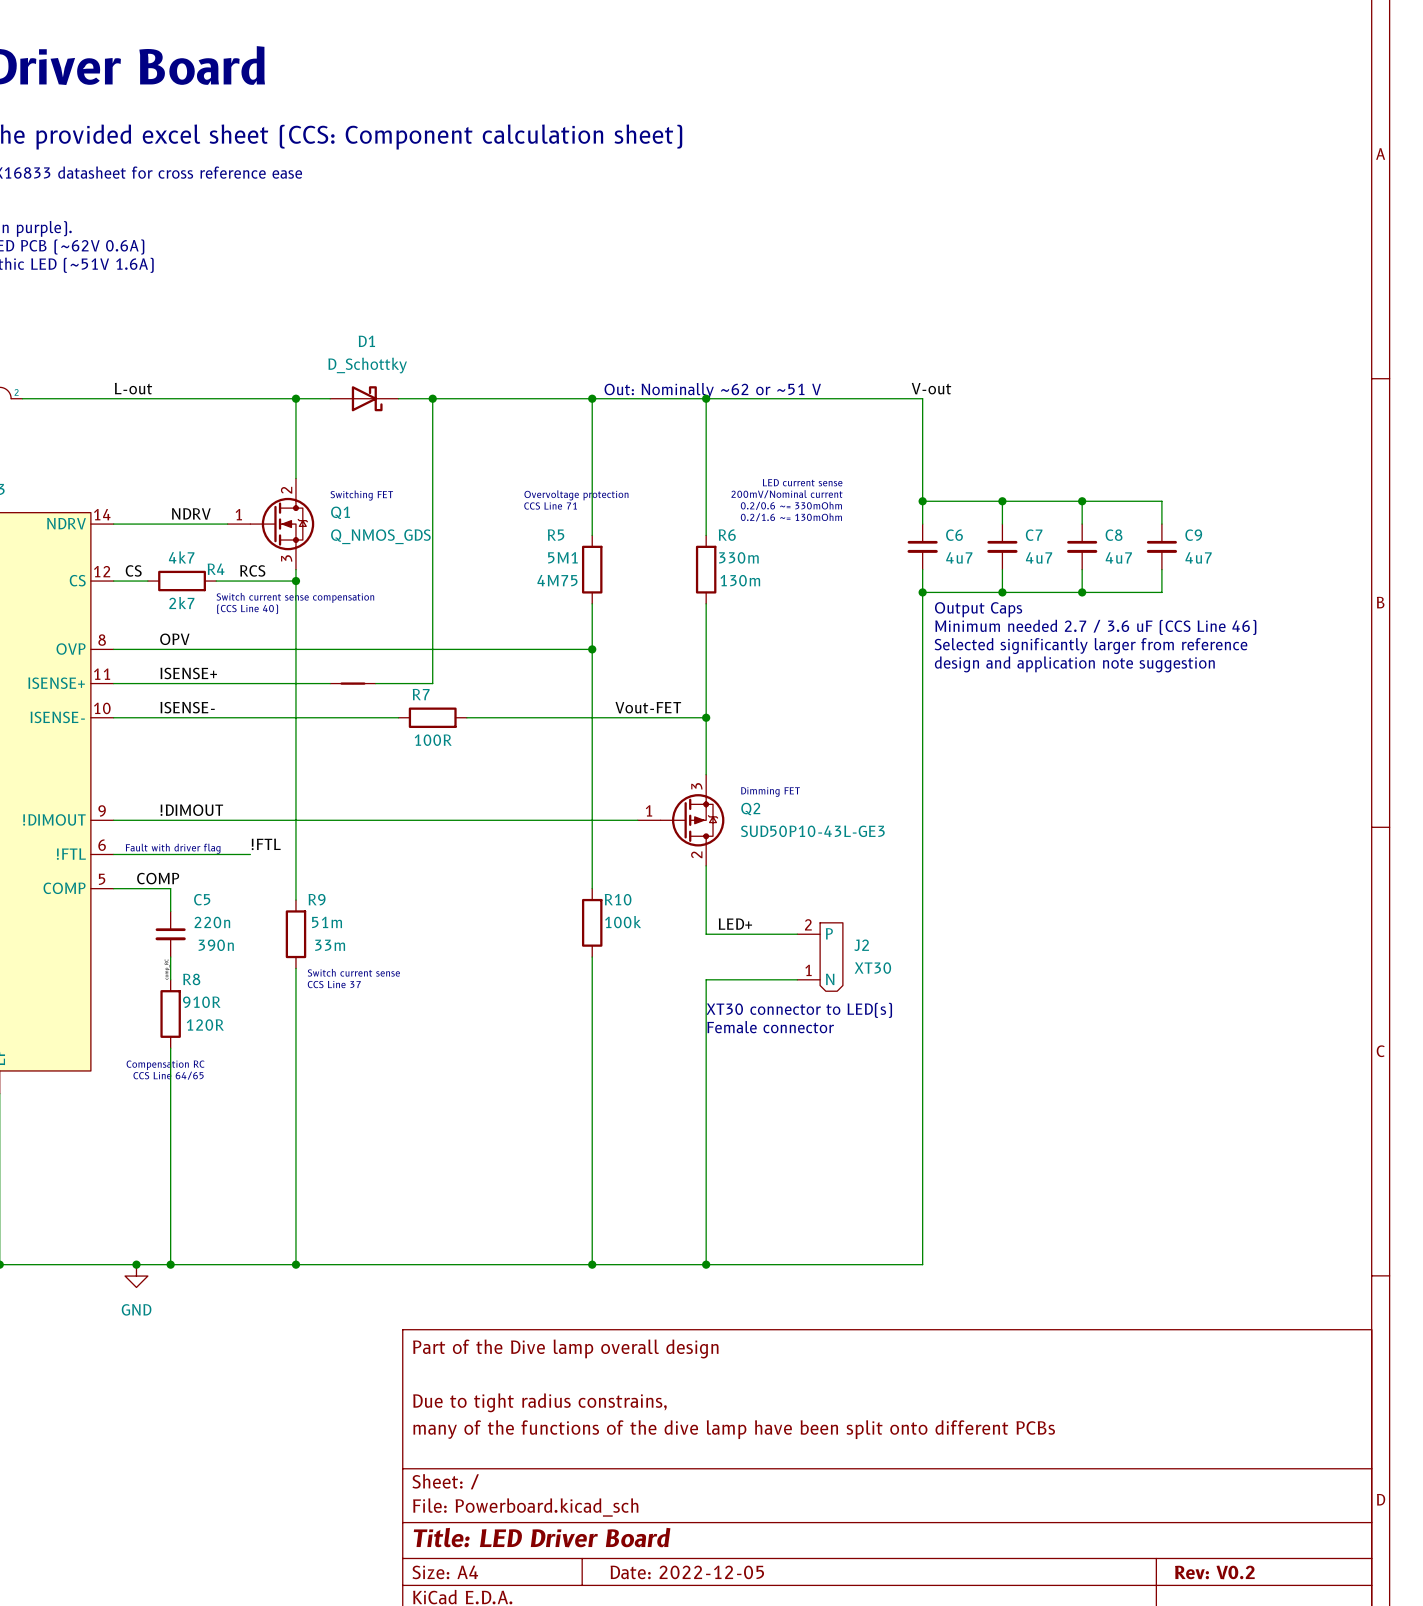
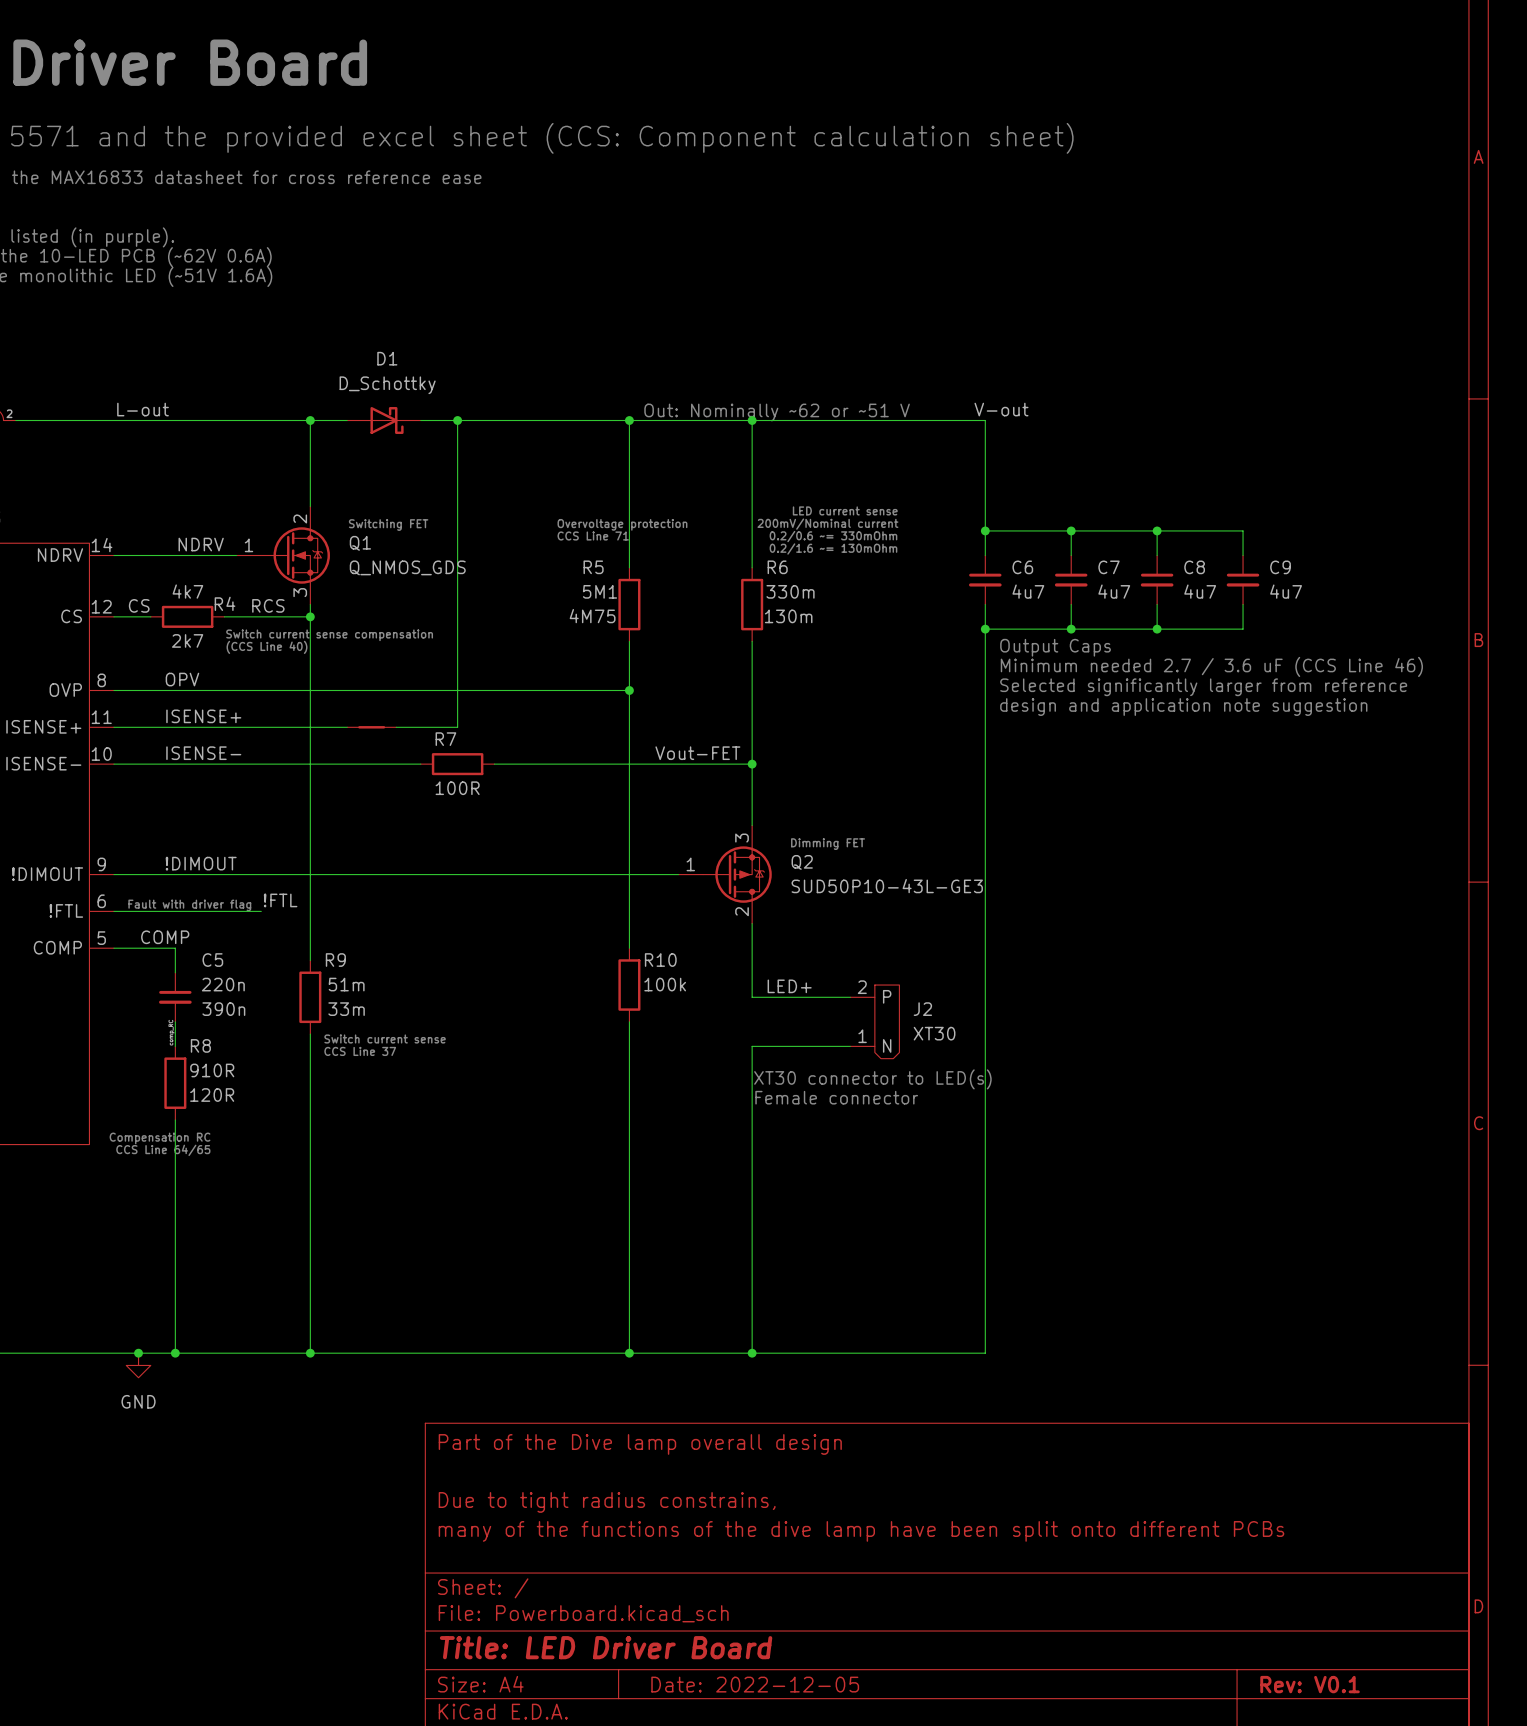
title block: Rev: V0.2 (1214, 1572) -> Rev: V0.1 (1310, 1684)

